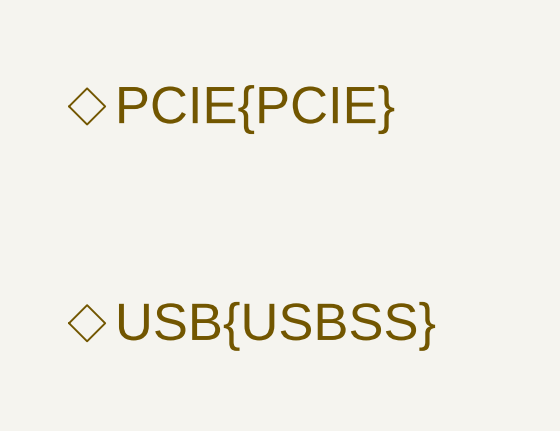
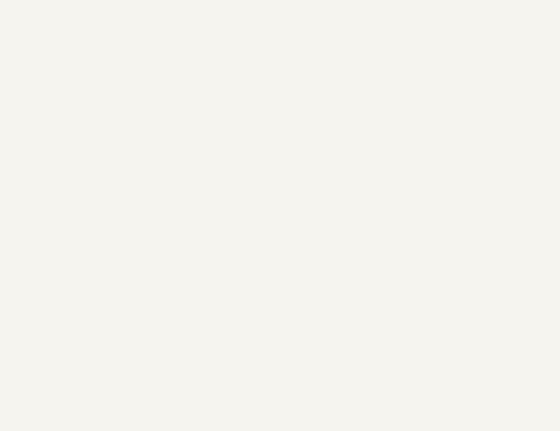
hierarchical label: PCIE{PCIE} (256, 109) -> none
hierarchical label: USB{USBSS} (277, 326) -> none

